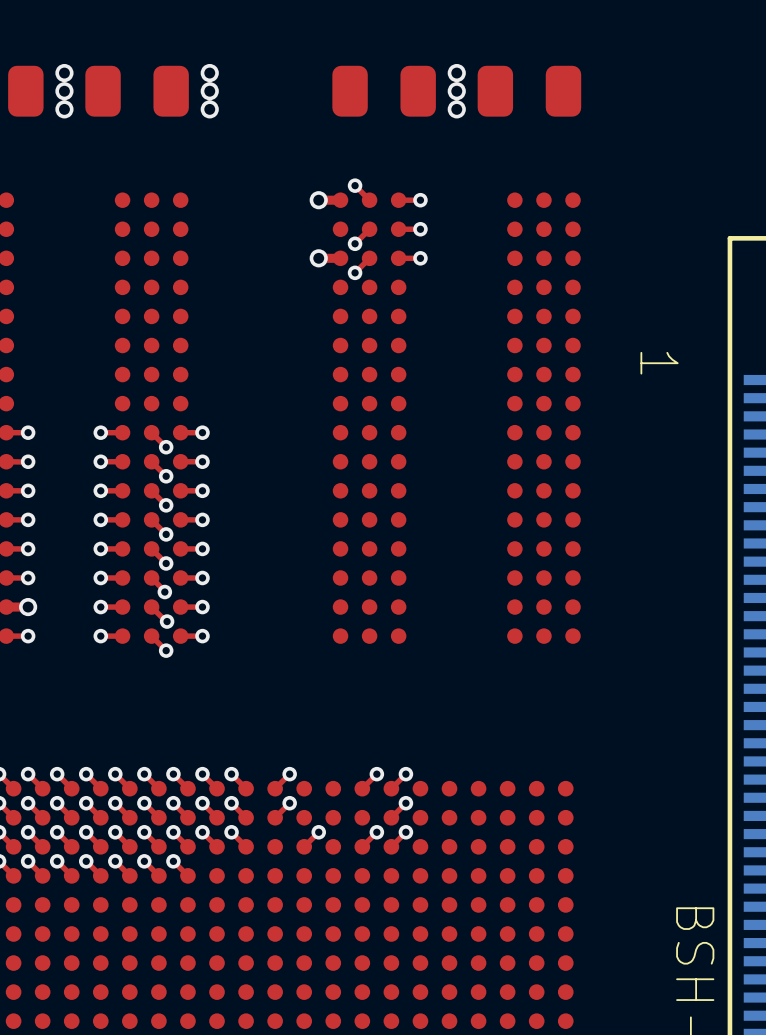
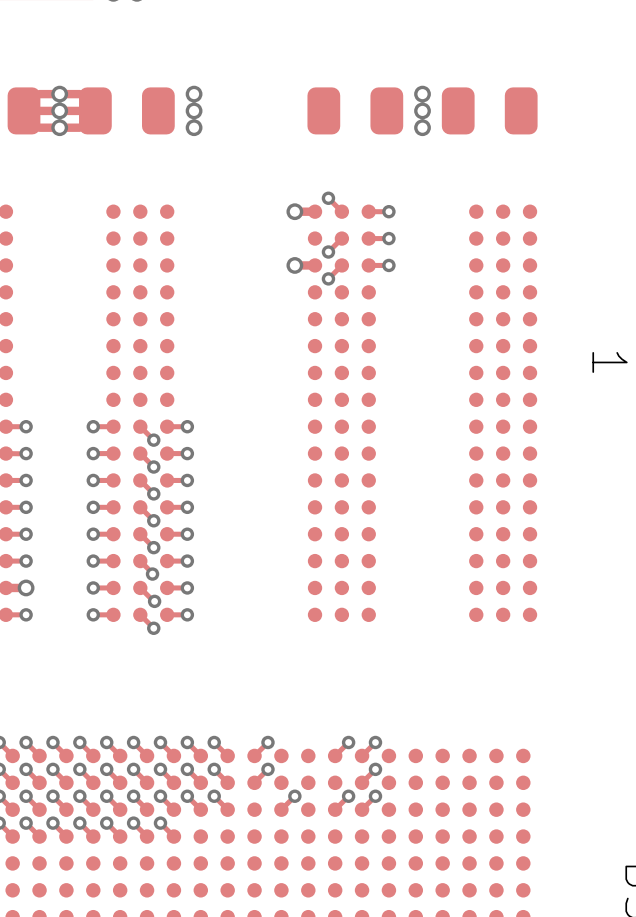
top track: none -> (79, 94) (39, 94)
top track: none -> (79, 110) (39, 110)
top track: none -> (79, 127) (39, 127)

